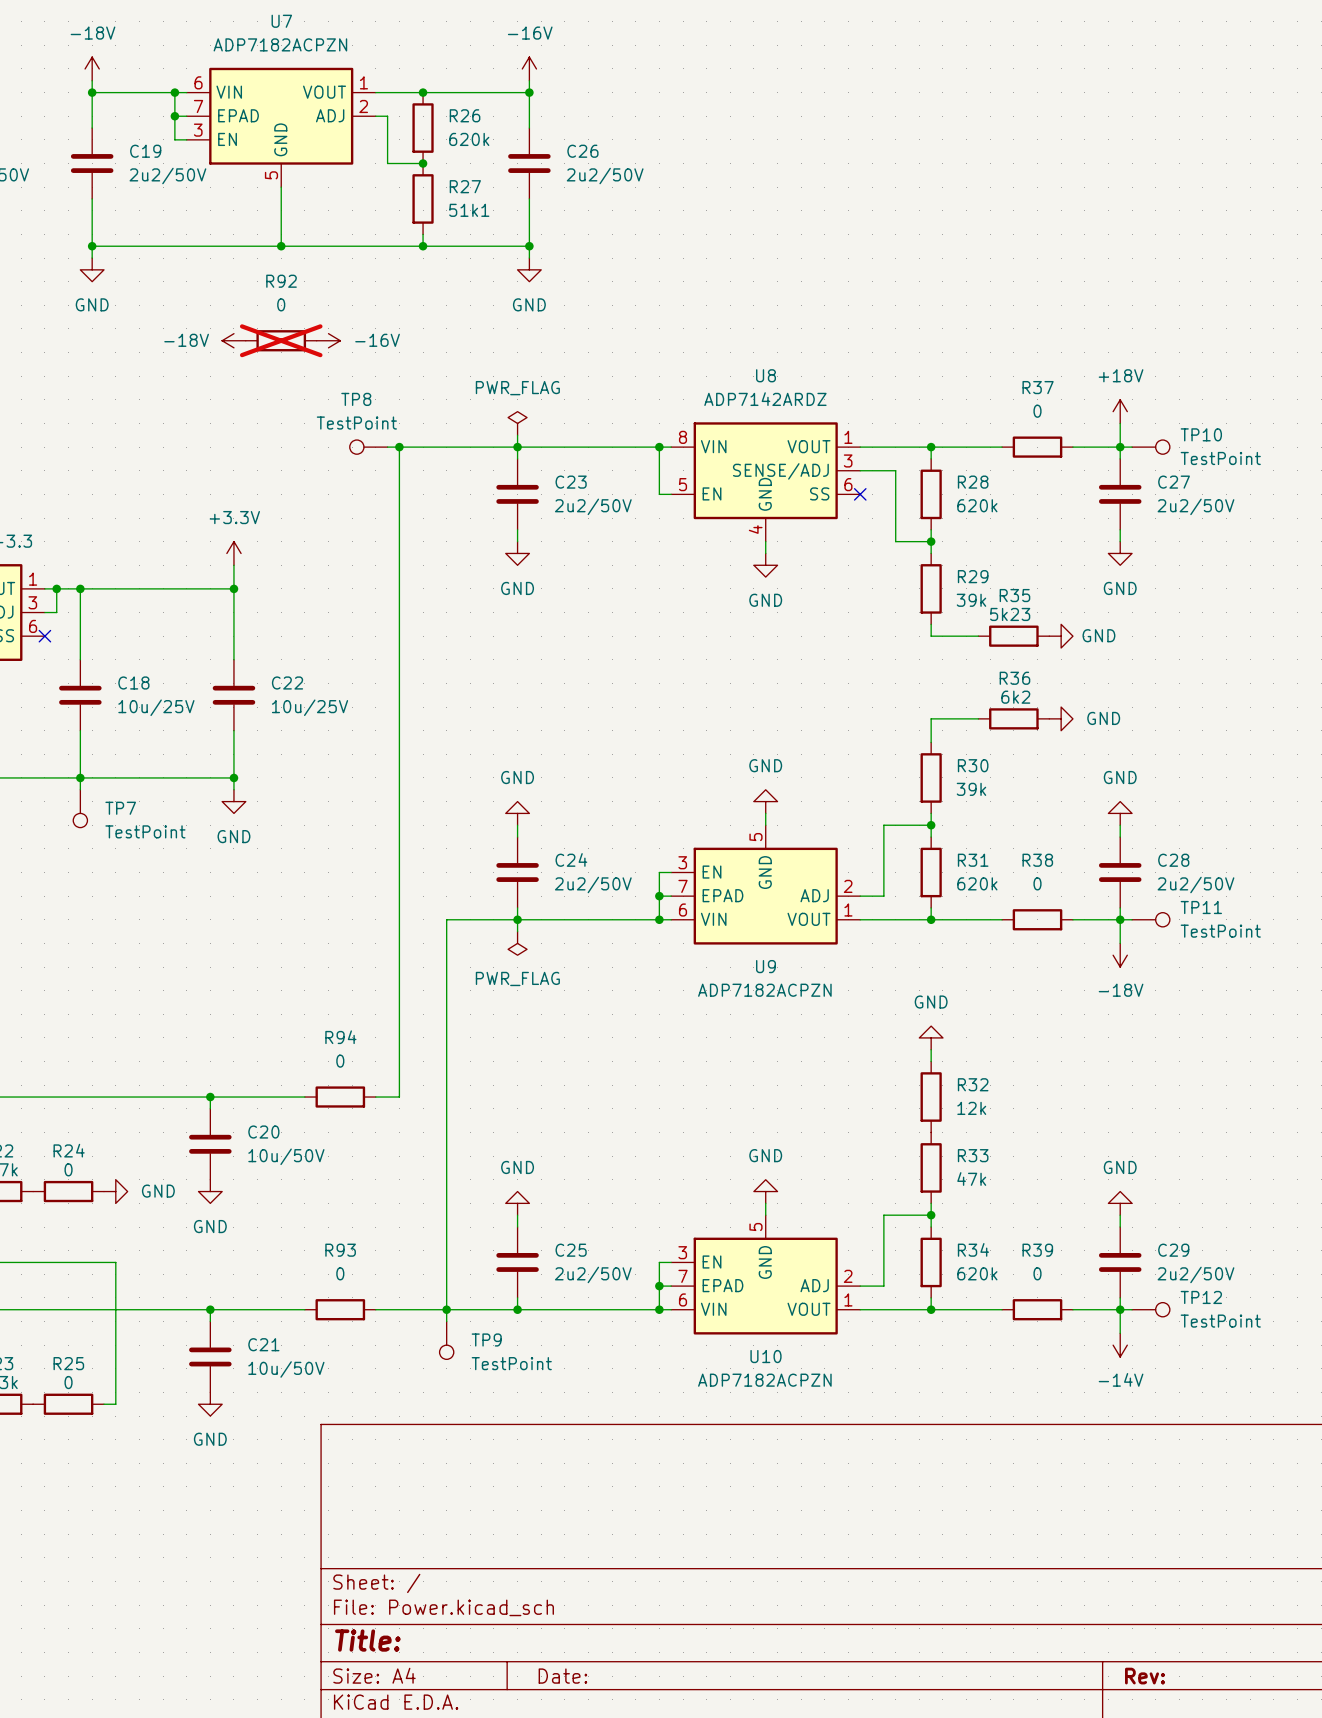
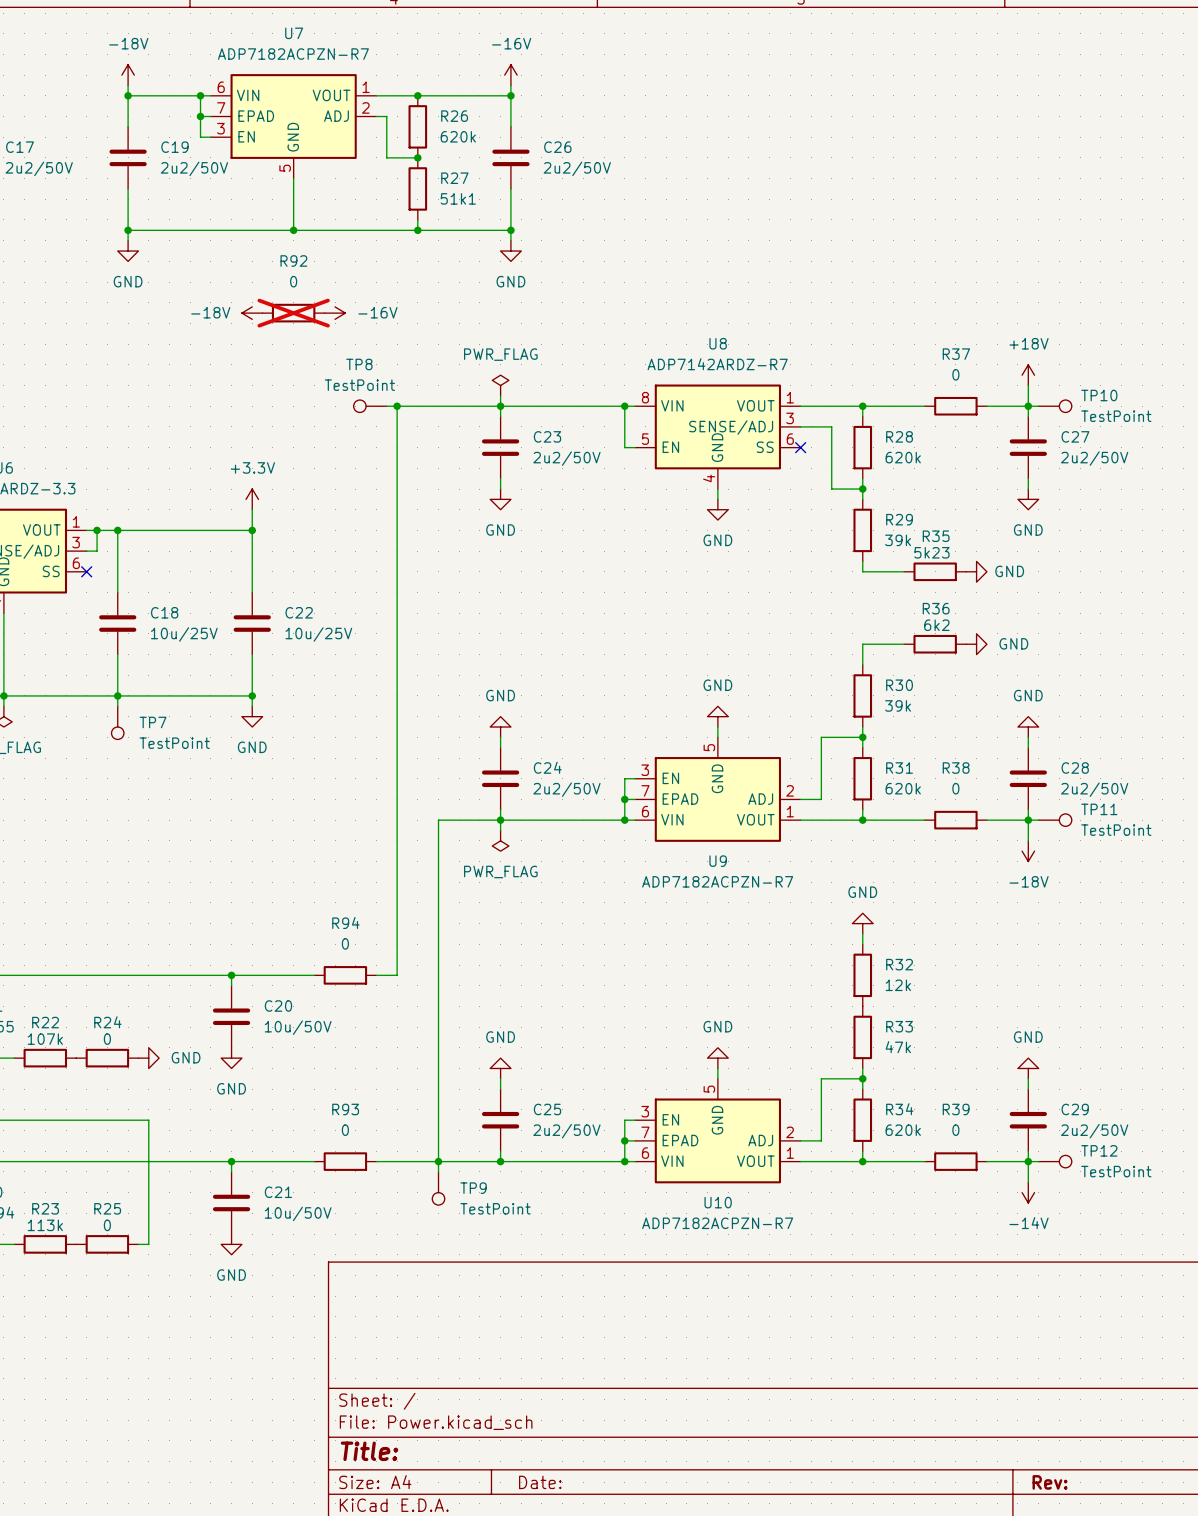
U7 value: ADP7182ACPZN (280, 44) -> ADP7182ACPZN-R7 (293, 54)
U8 value: ADP7142ARDZ (765, 399) -> ADP7142ARDZ-R7 (717, 364)
U9 value: ADP7182ACPZN (764, 990) -> ADP7182ACPZN-R7 (717, 881)
U10 value: ADP7182ACPZN (764, 1380) -> ADP7182ACPZN-R7 (717, 1223)

